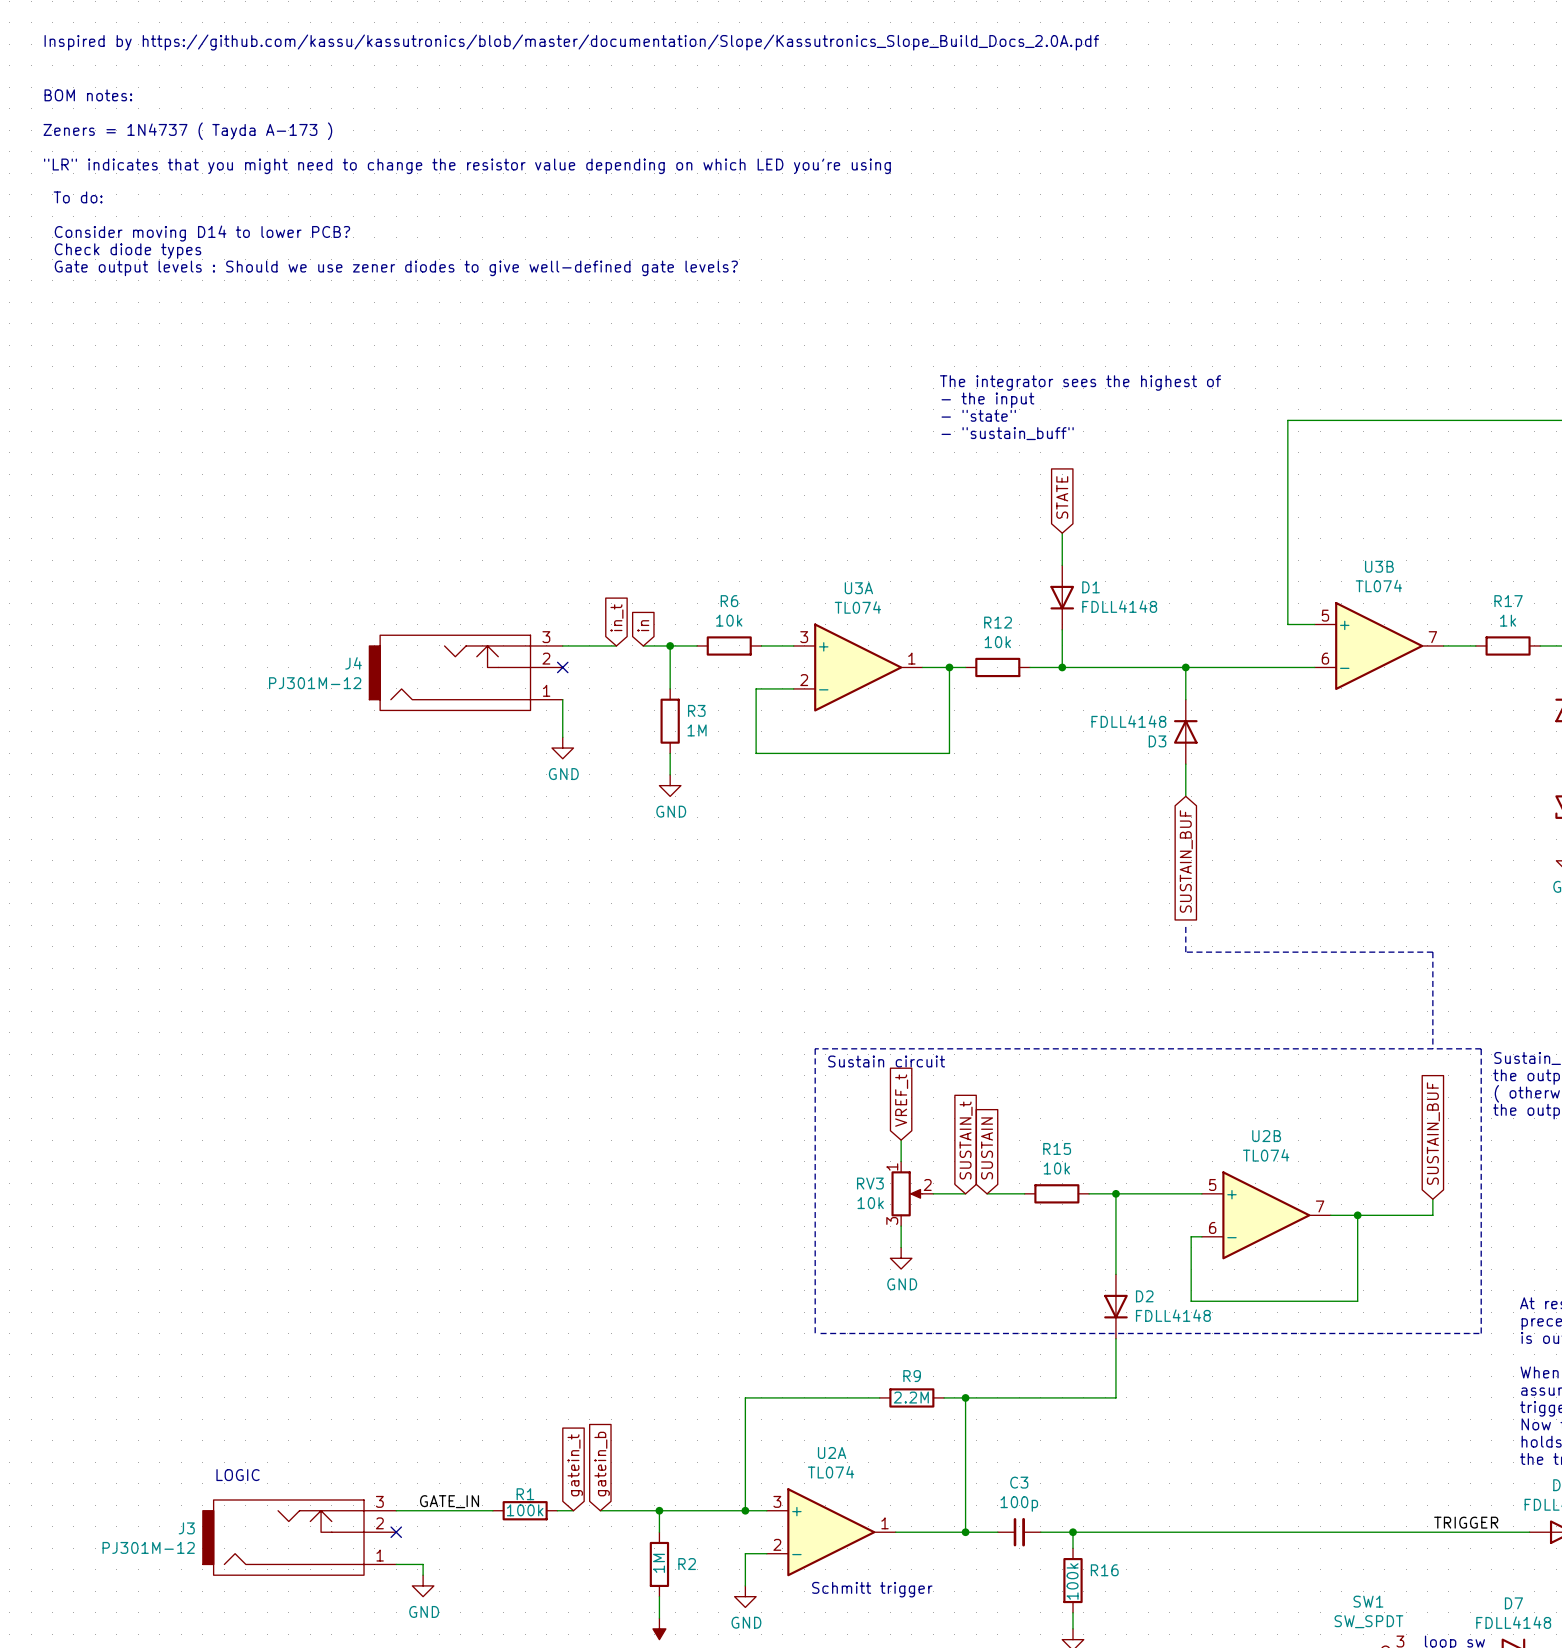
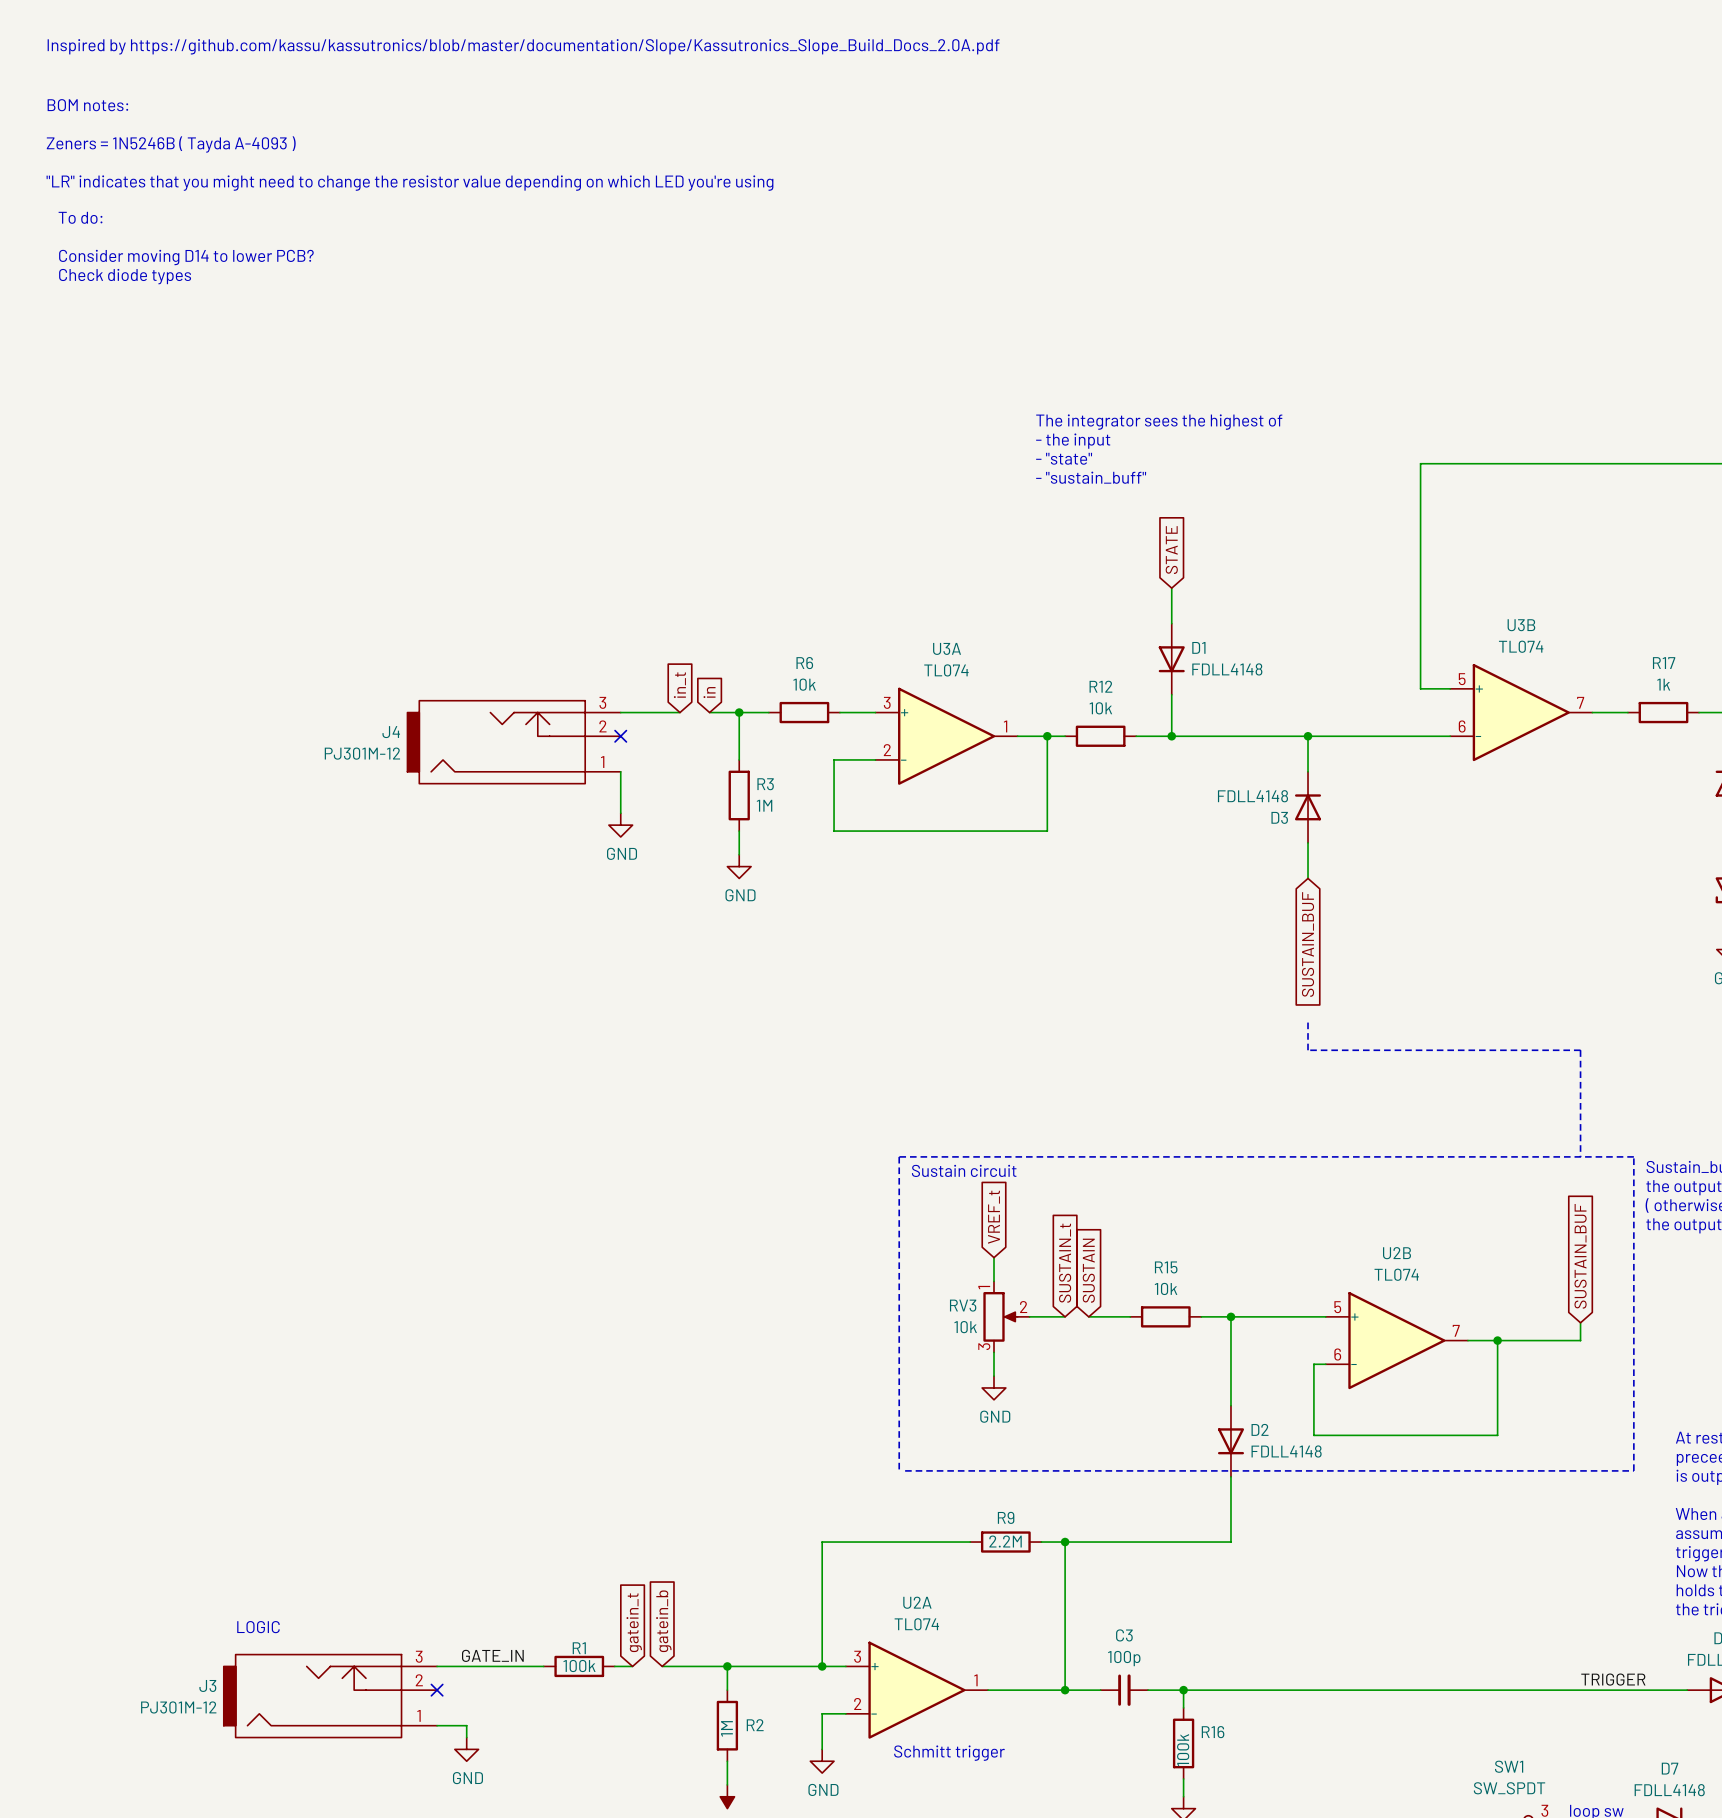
text: Zeners = 1N4737 ( Tayda A-173 ) (187, 131) -> Zeners = 1N5246B ( Tayda A-4093 ) (171, 144)
text: Gate output levels : Should we use zener diodes to give well-defined gate levels? (396, 268) -> none

